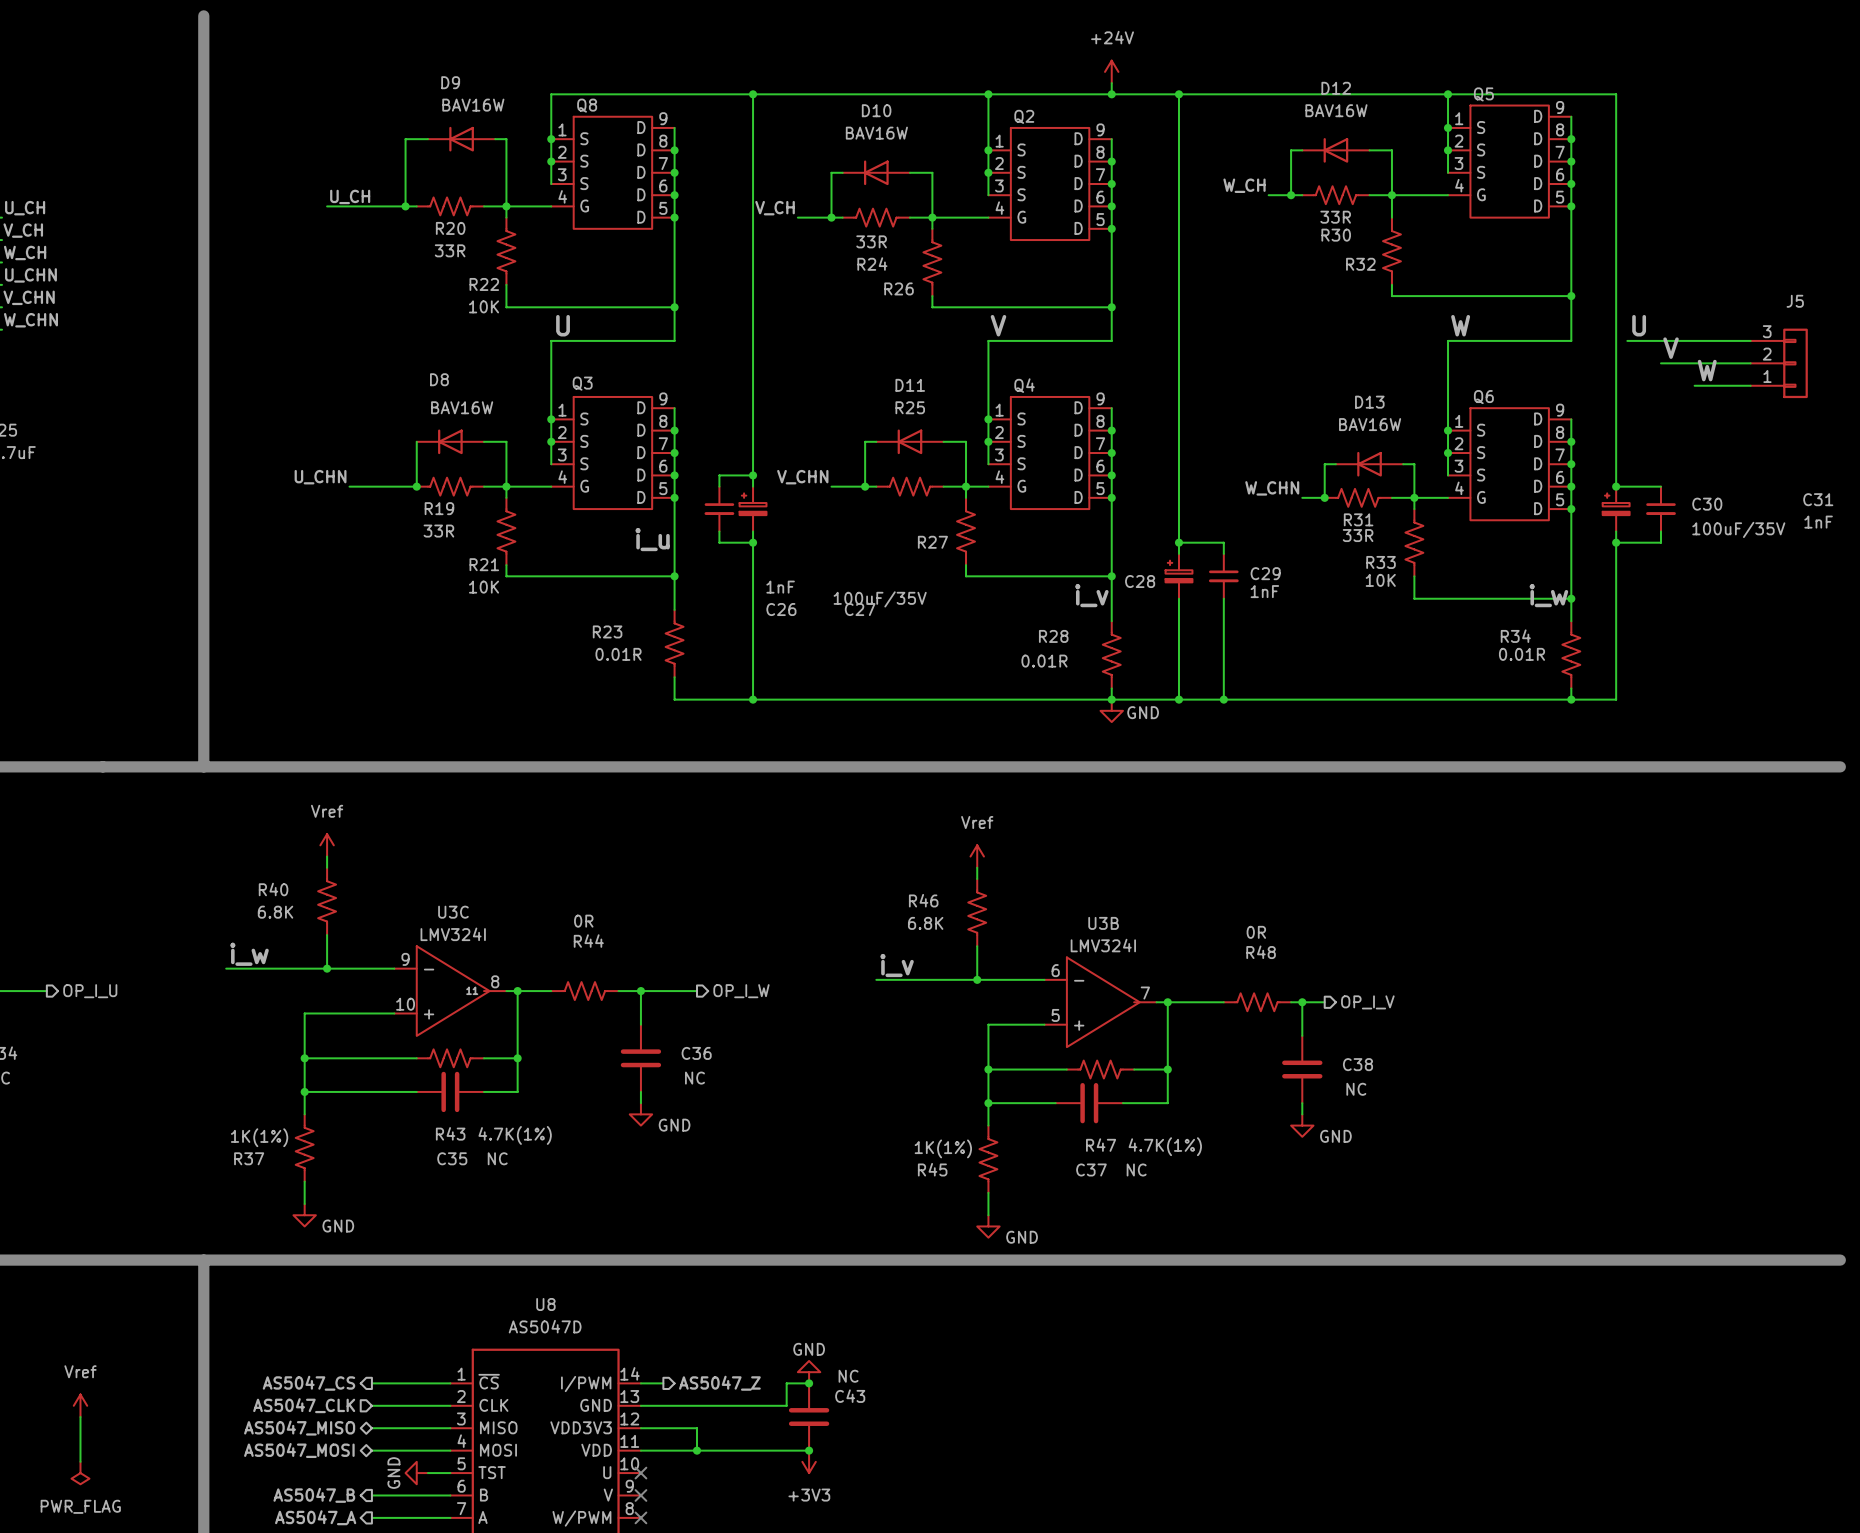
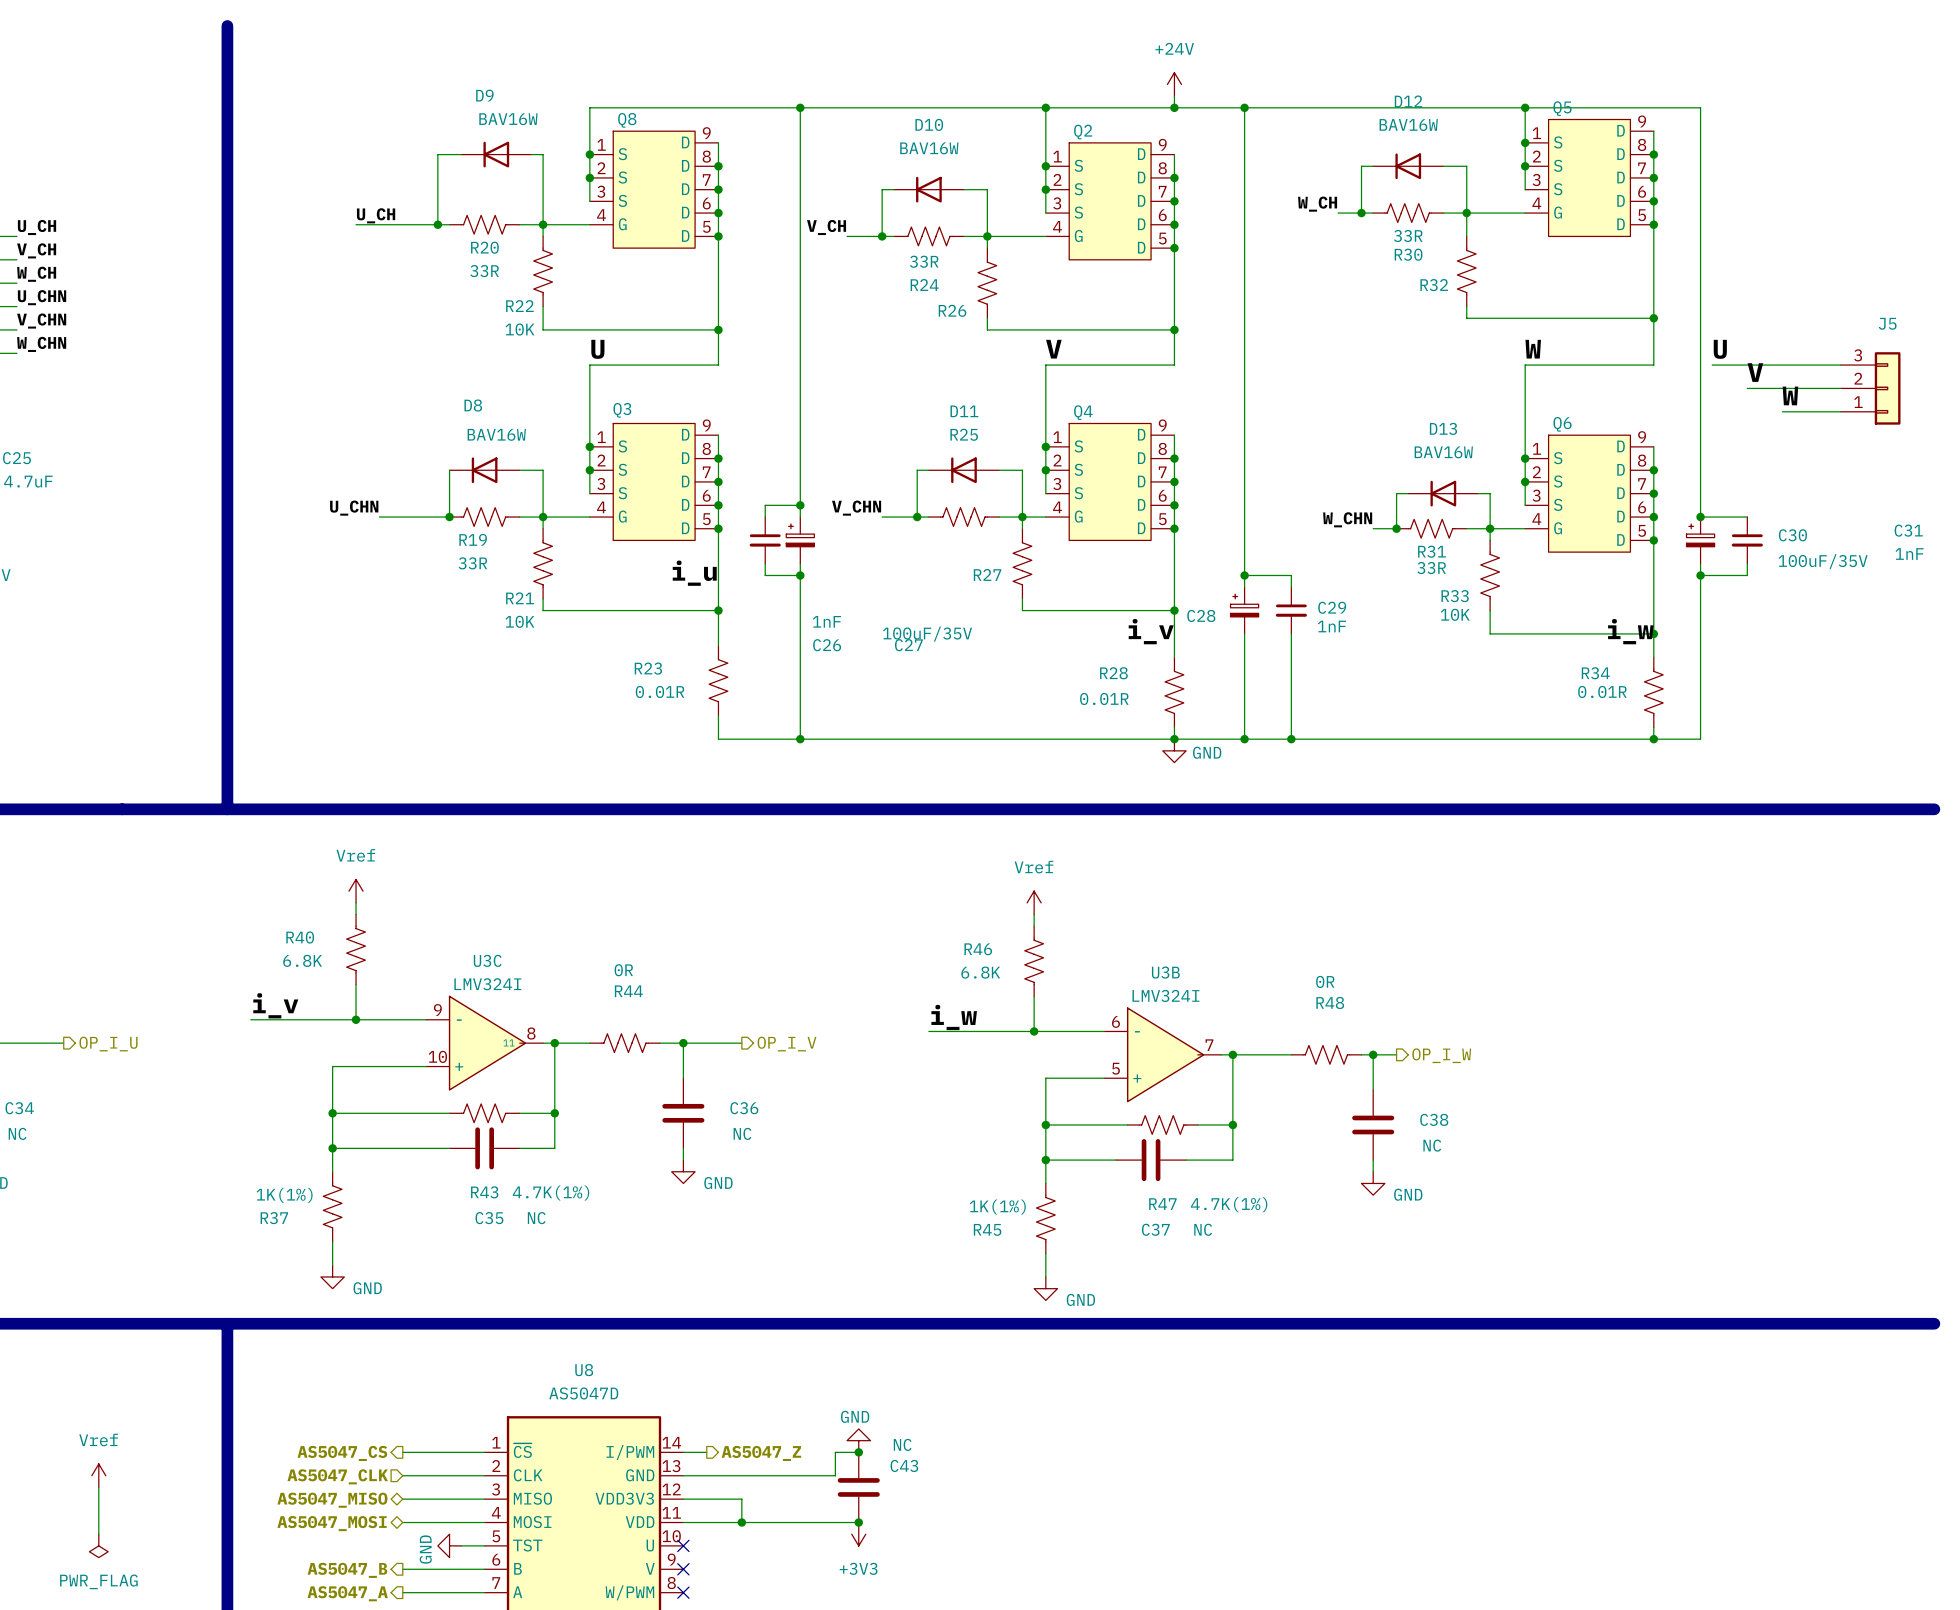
label: i_w (249, 954) -> i_v (275, 1005)
label: i_v (897, 965) -> i_w (954, 1017)
hierarchical label: OP_I_W (741, 991) -> OP_I_V (787, 1044)
hierarchical label: OP_I_V (1367, 1002) -> OP_I_W (1441, 1055)

